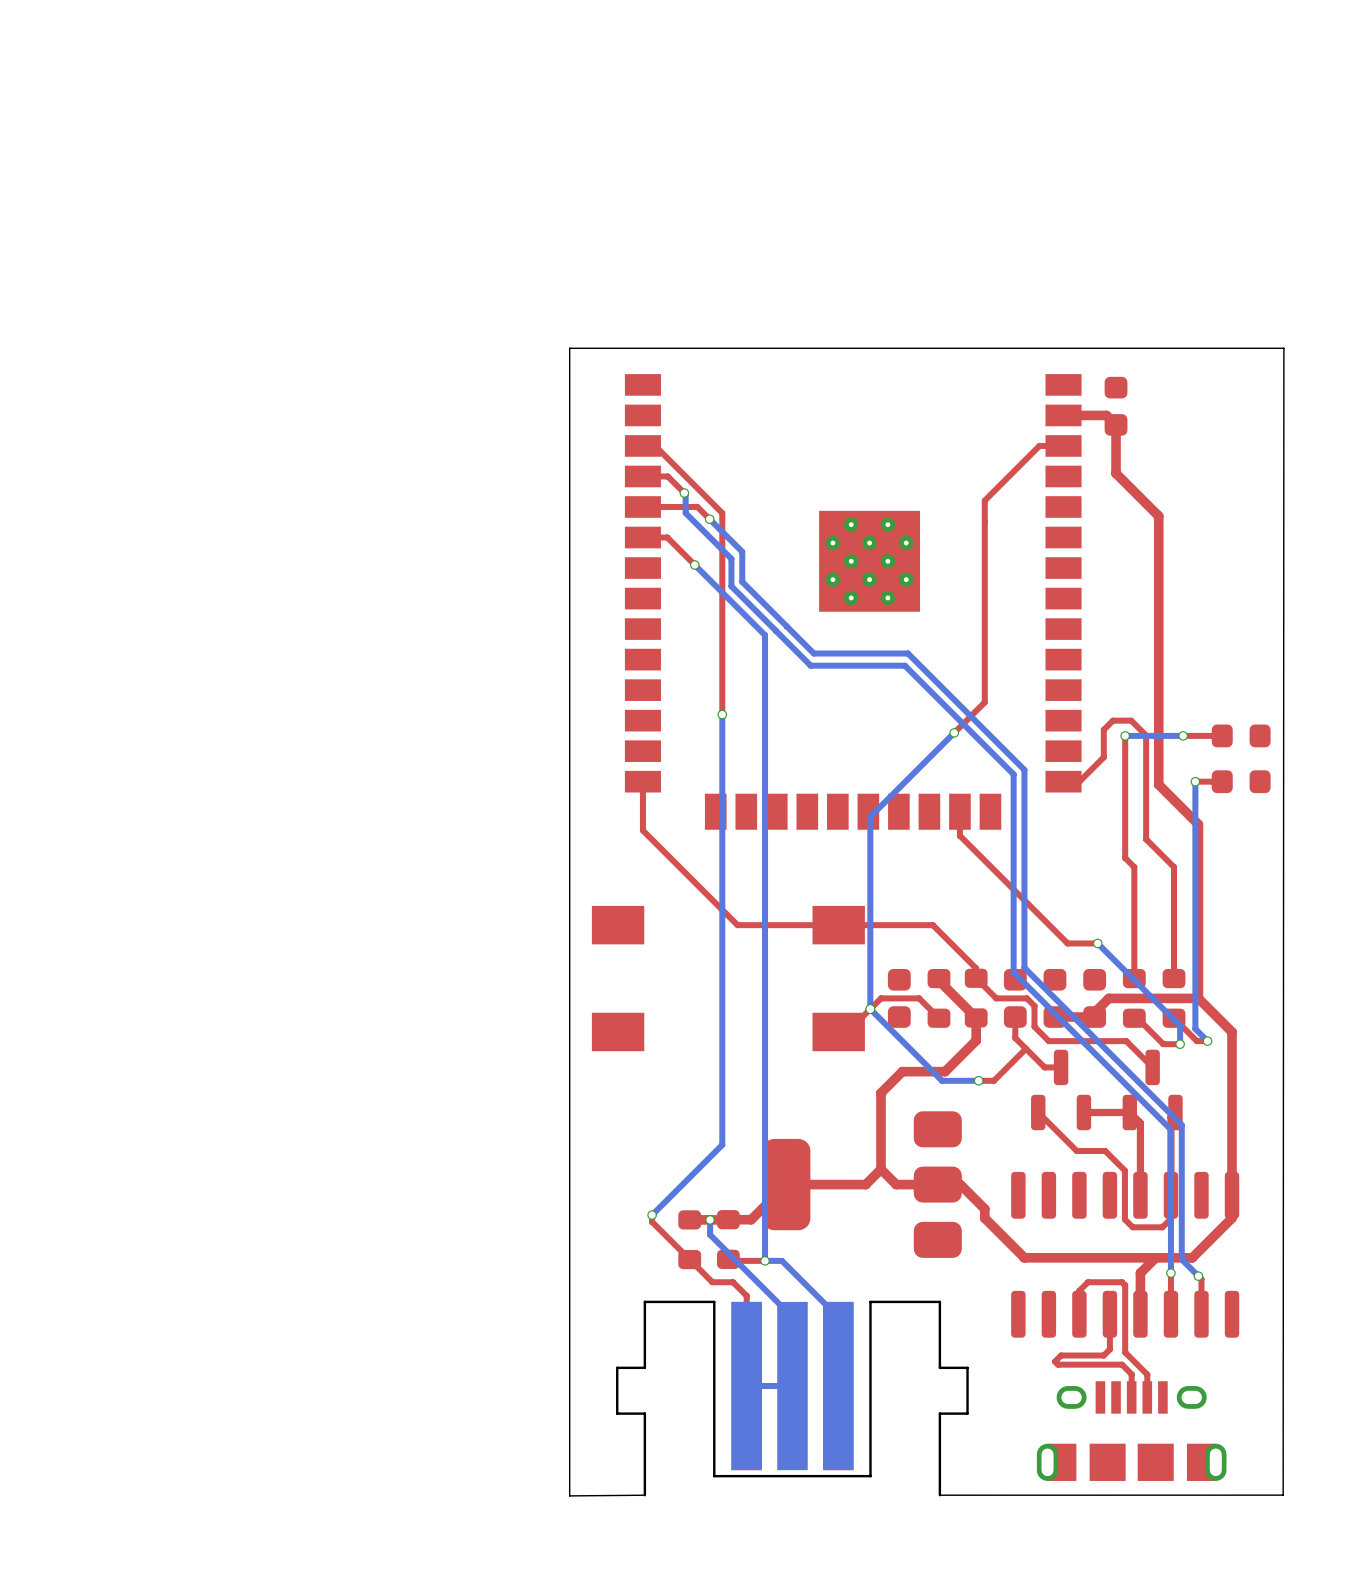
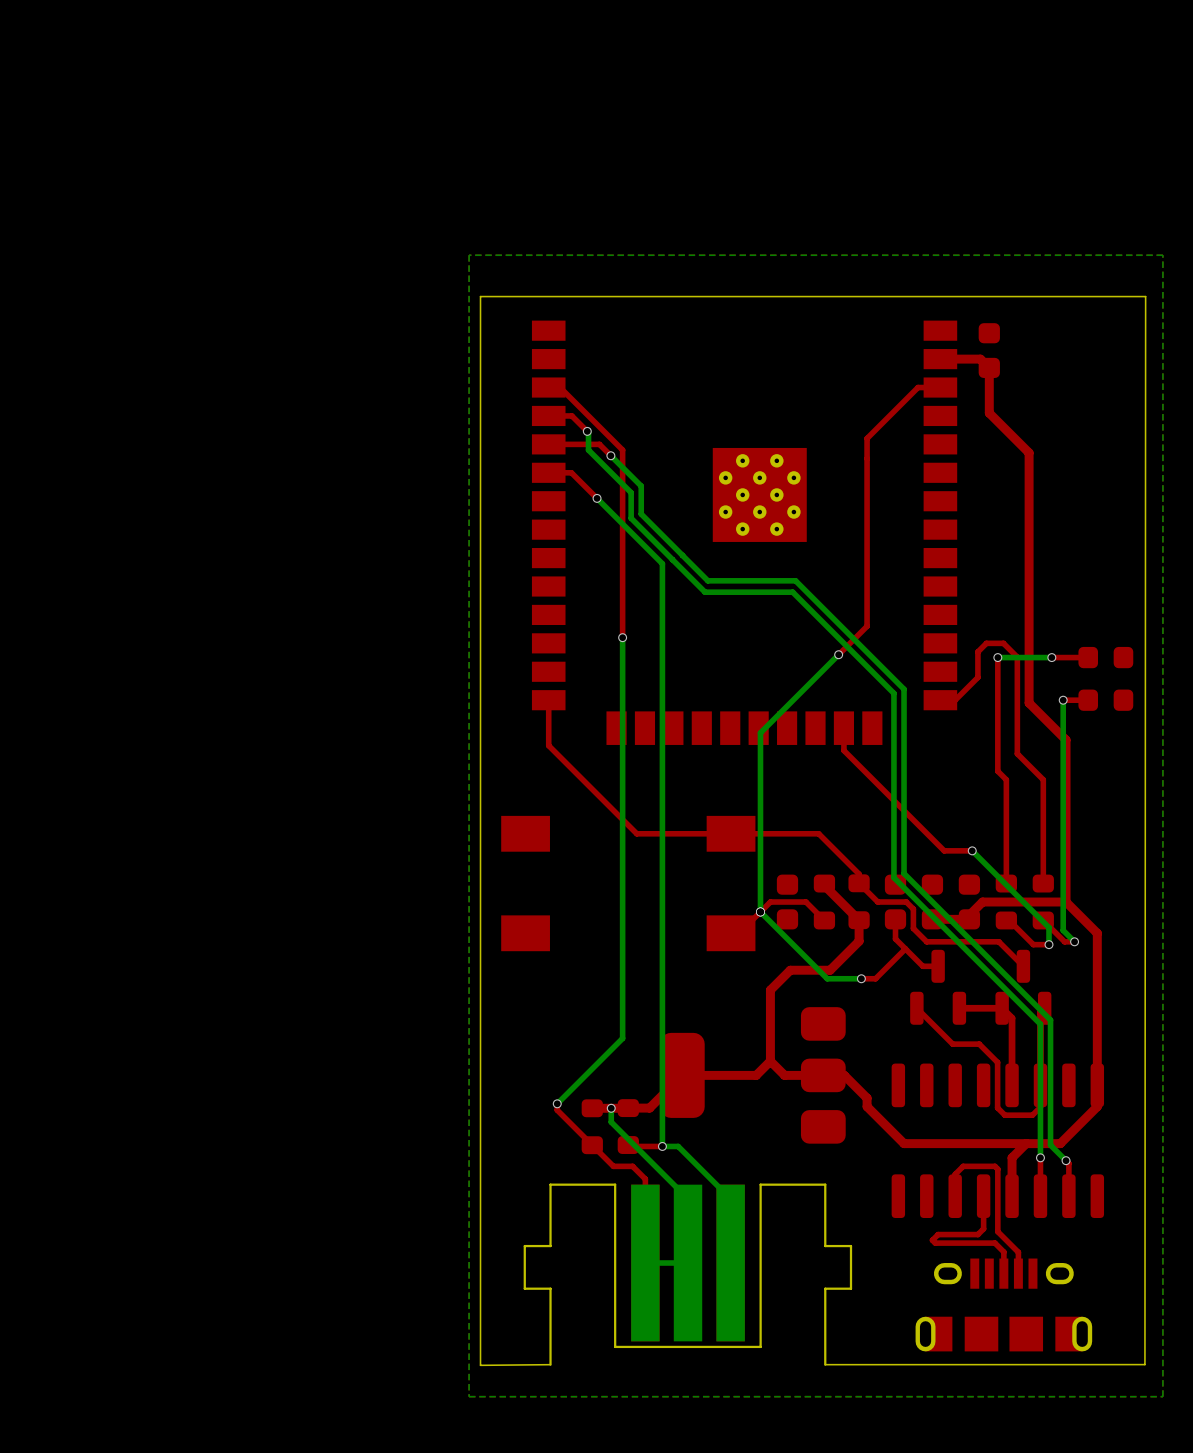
bottom zone outline: none -> (1162, 255) (469, 255) (469, 1396) (1162, 1396) (1162, 255)

